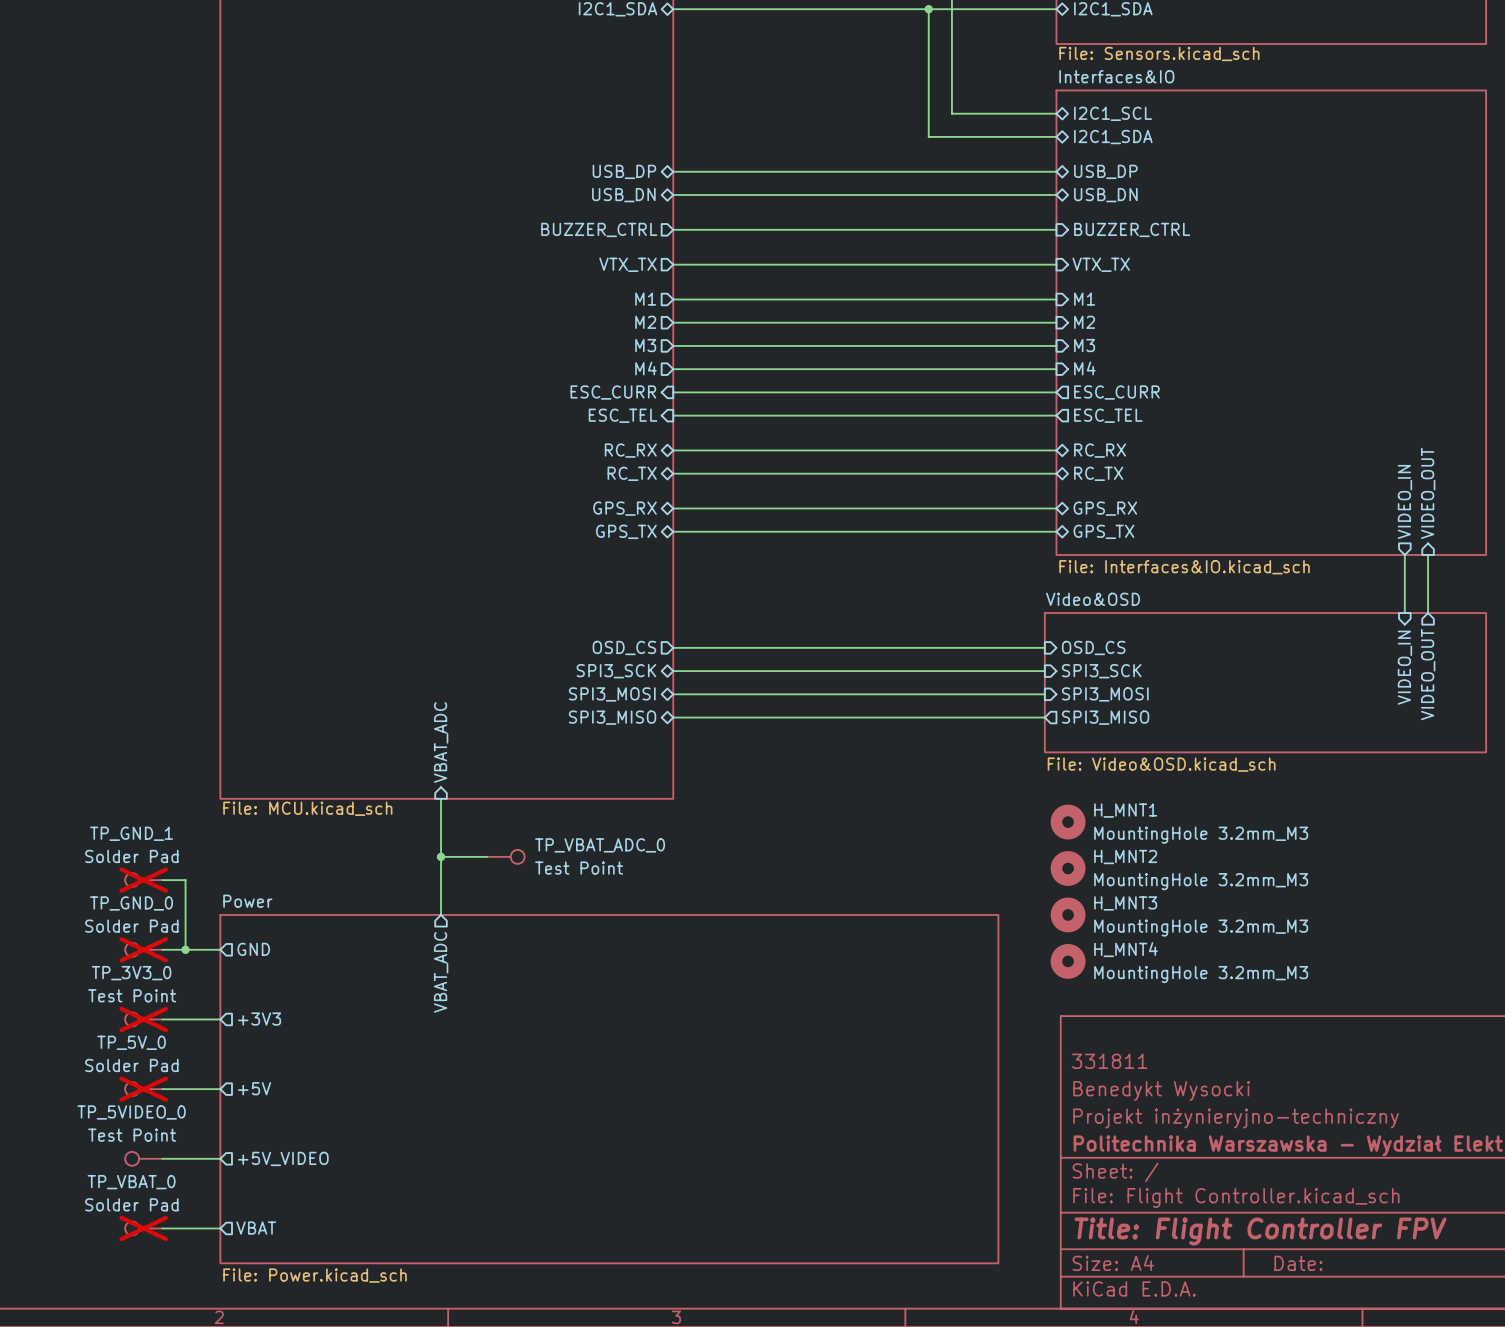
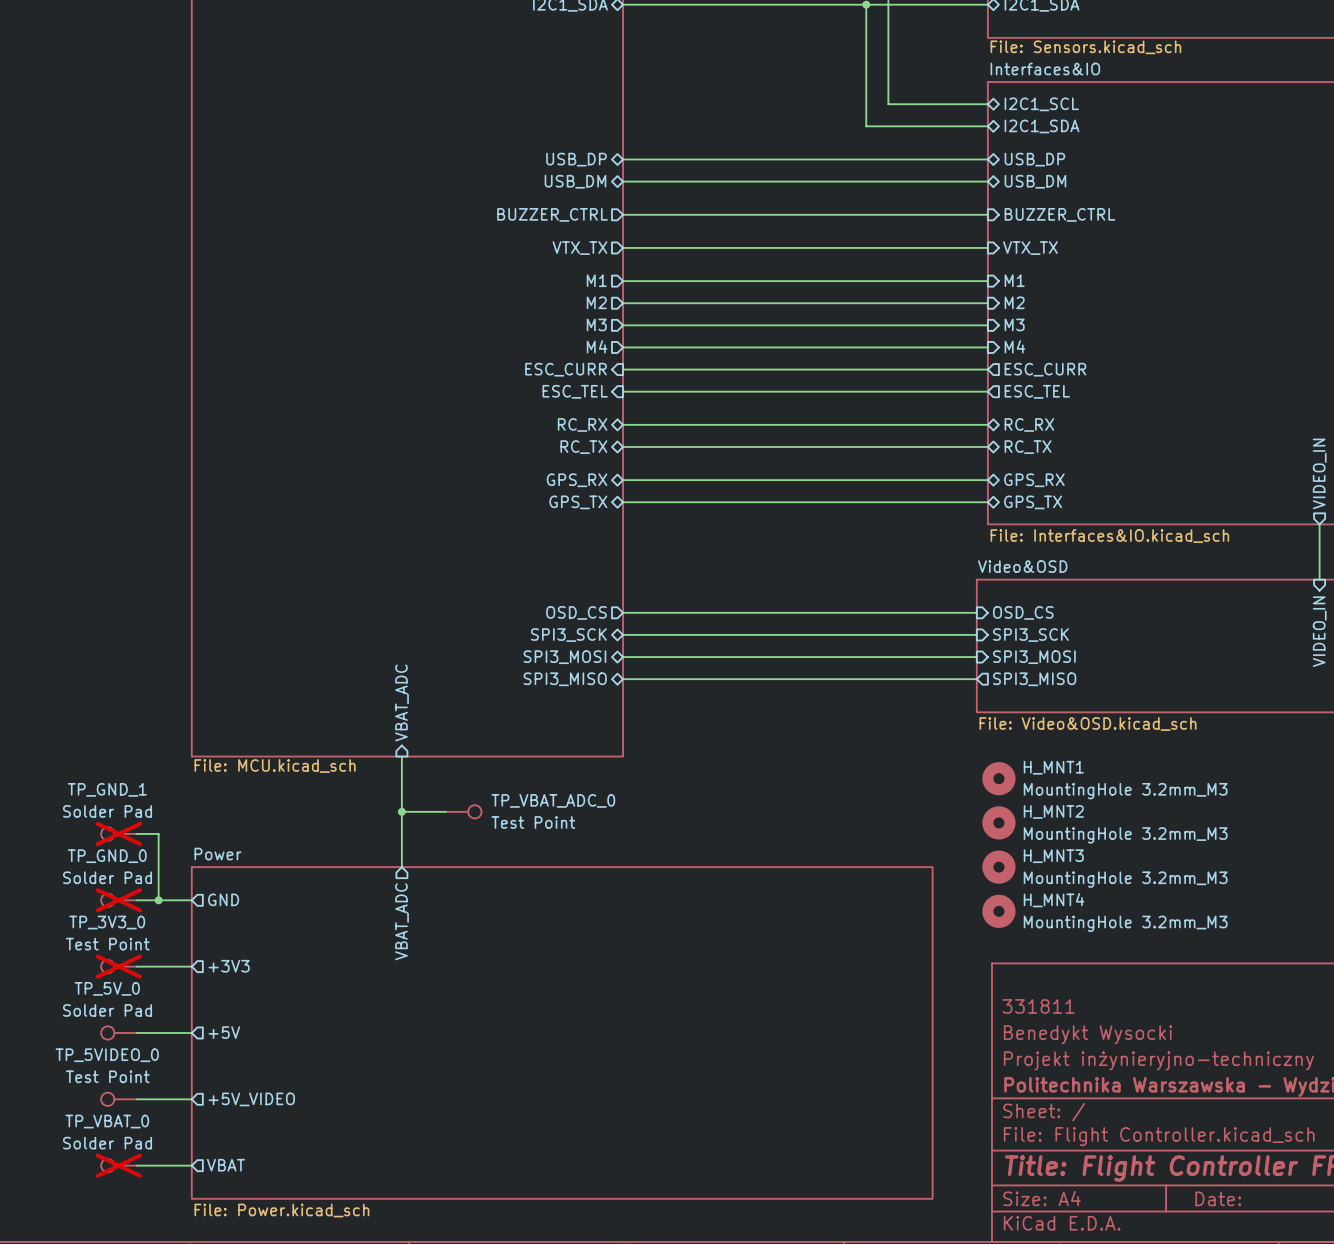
sheet pin: USB_DN (623, 195) -> USB_DM (575, 181)
sheet pin: USB_DN (1105, 195) -> USB_DM (1035, 181)
TP_5V_0 do-not-place cross: (143, 1089) -> none

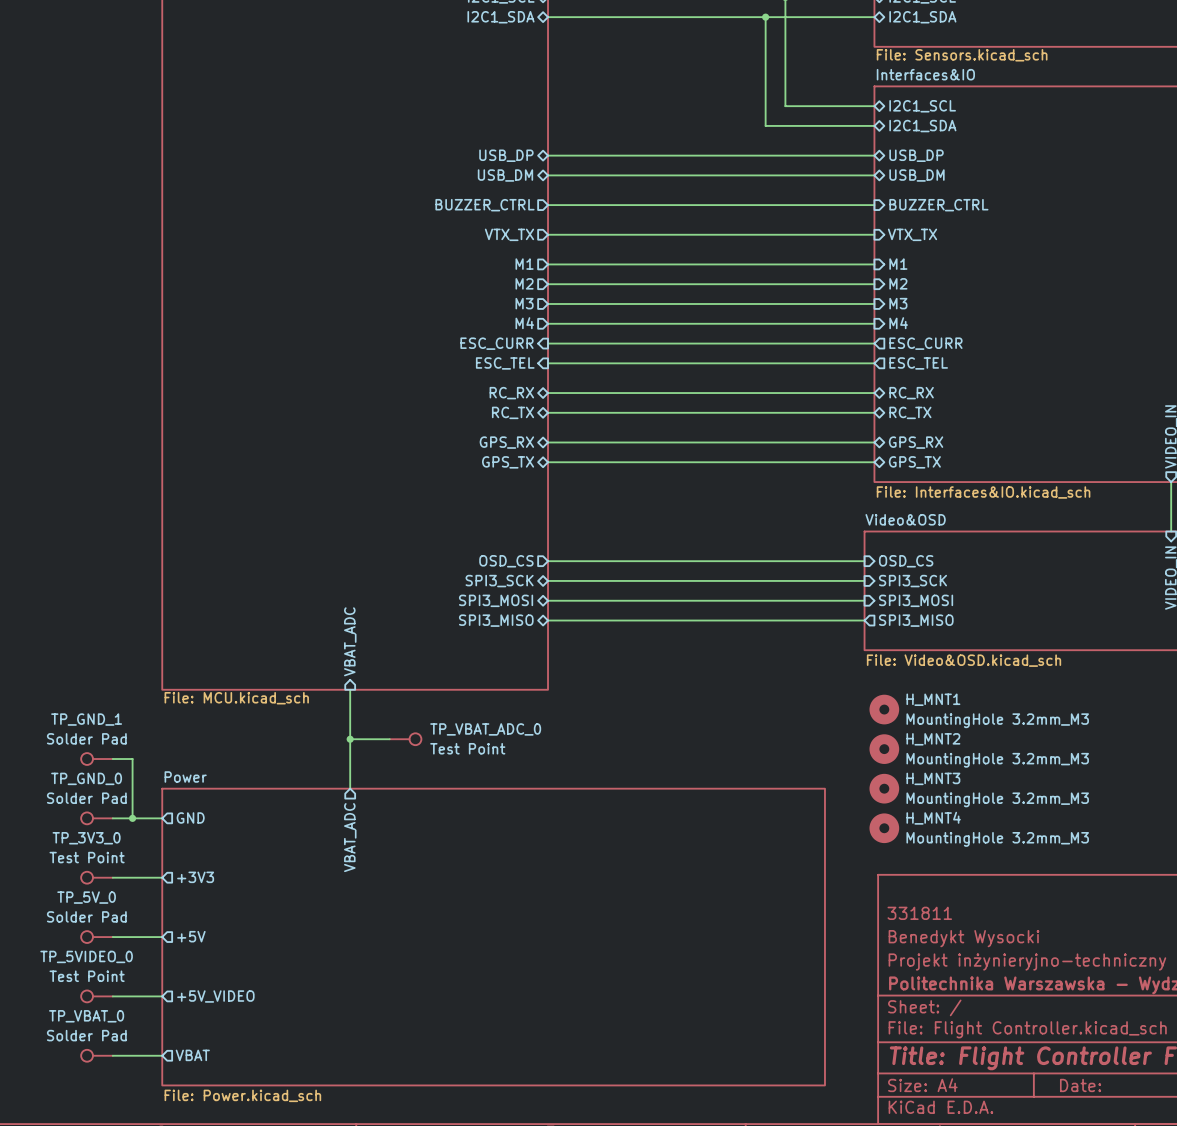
TP_GND_1 do-not-place cross: (118, 833) -> none
TP_GND_0 do-not-place cross: (118, 900) -> none
TP_3V3_0 do-not-place cross: (118, 966) -> none
TP_VBAT_0 do-not-place cross: (118, 1165) -> none

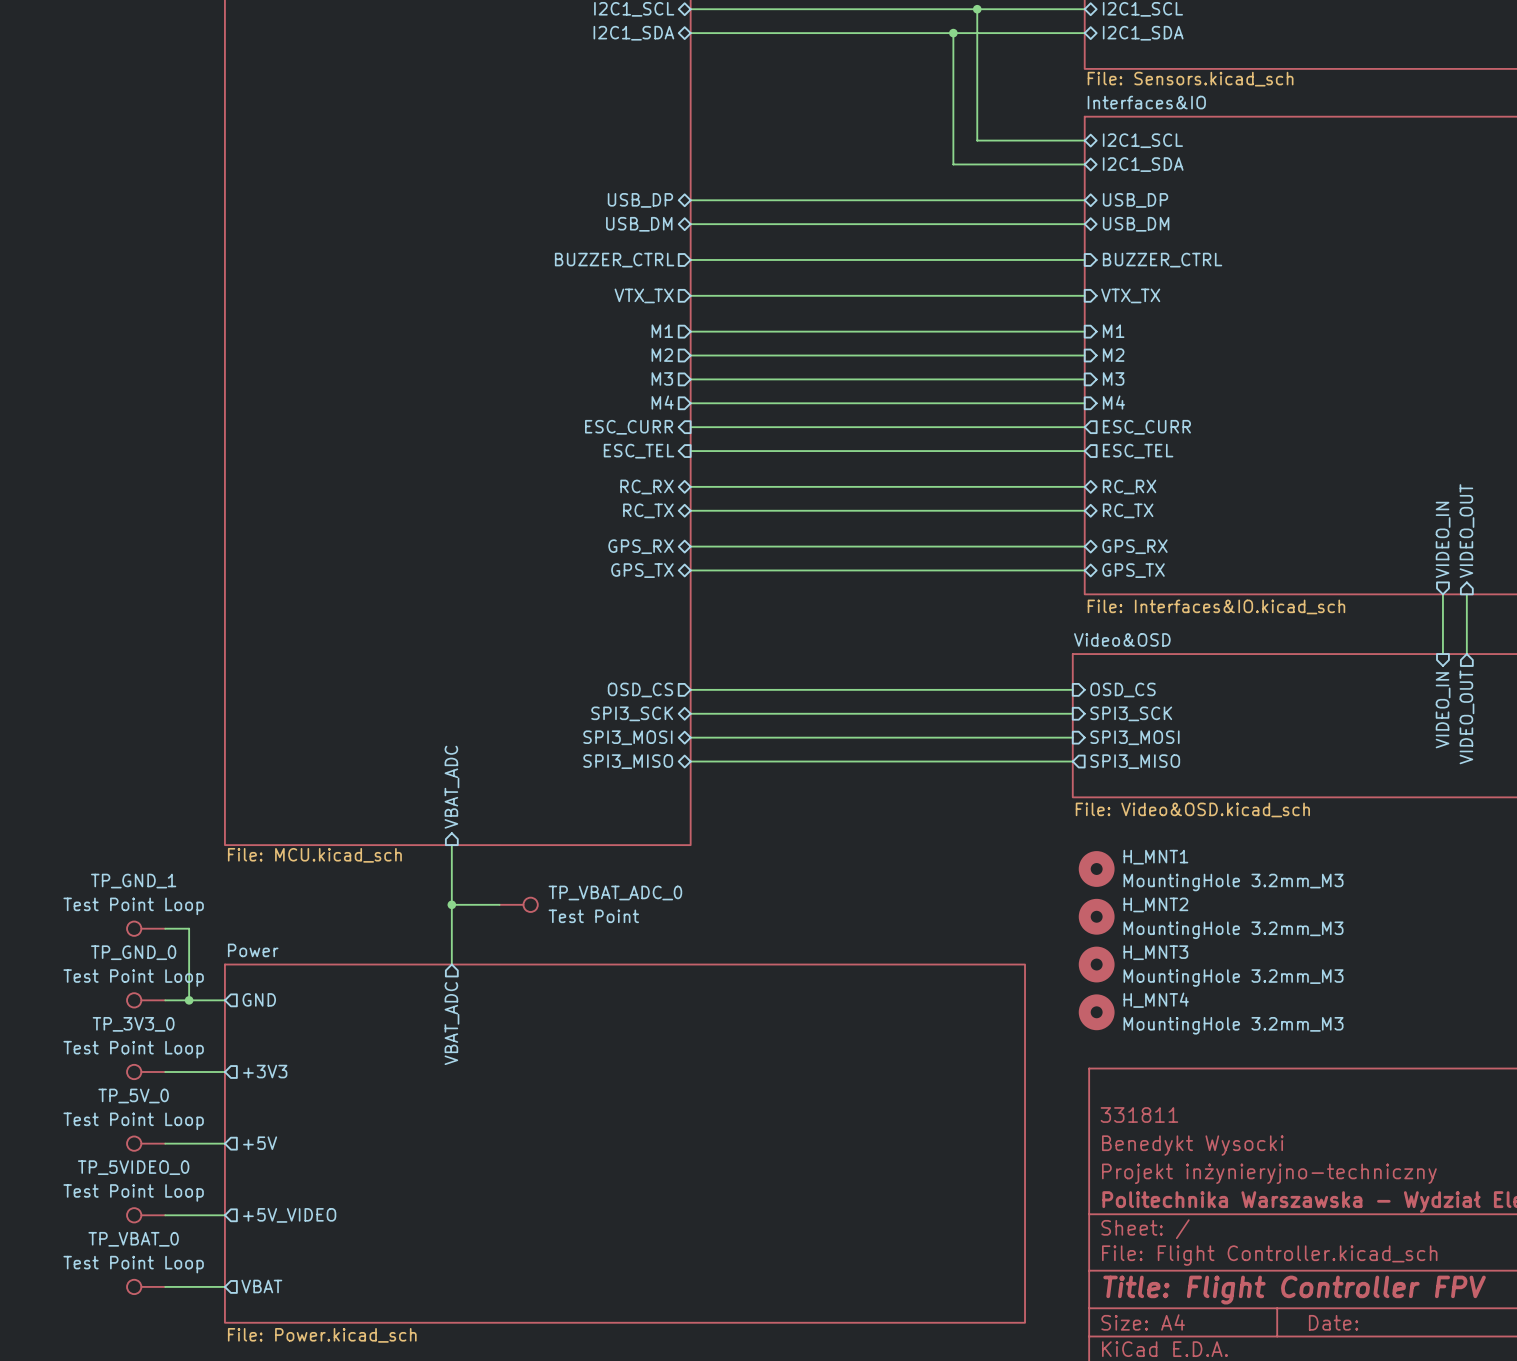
TP_GND_1 value: Solder Pad (86, 738) -> Test Point Loop (133, 906)
TP_GND_0 value: Solder Pad (86, 798) -> Test Point Loop (133, 978)
TP_3V3_0 value: Test Point (87, 857) -> Test Point Loop (133, 1049)
TP_5V_0 value: Solder Pad (86, 916) -> Test Point Loop (133, 1121)
TP_5VIDEO_0 value: Test Point (87, 976) -> Test Point Loop (133, 1192)
TP_VBAT_0 value: Solder Pad (86, 1035) -> Test Point Loop (133, 1264)

